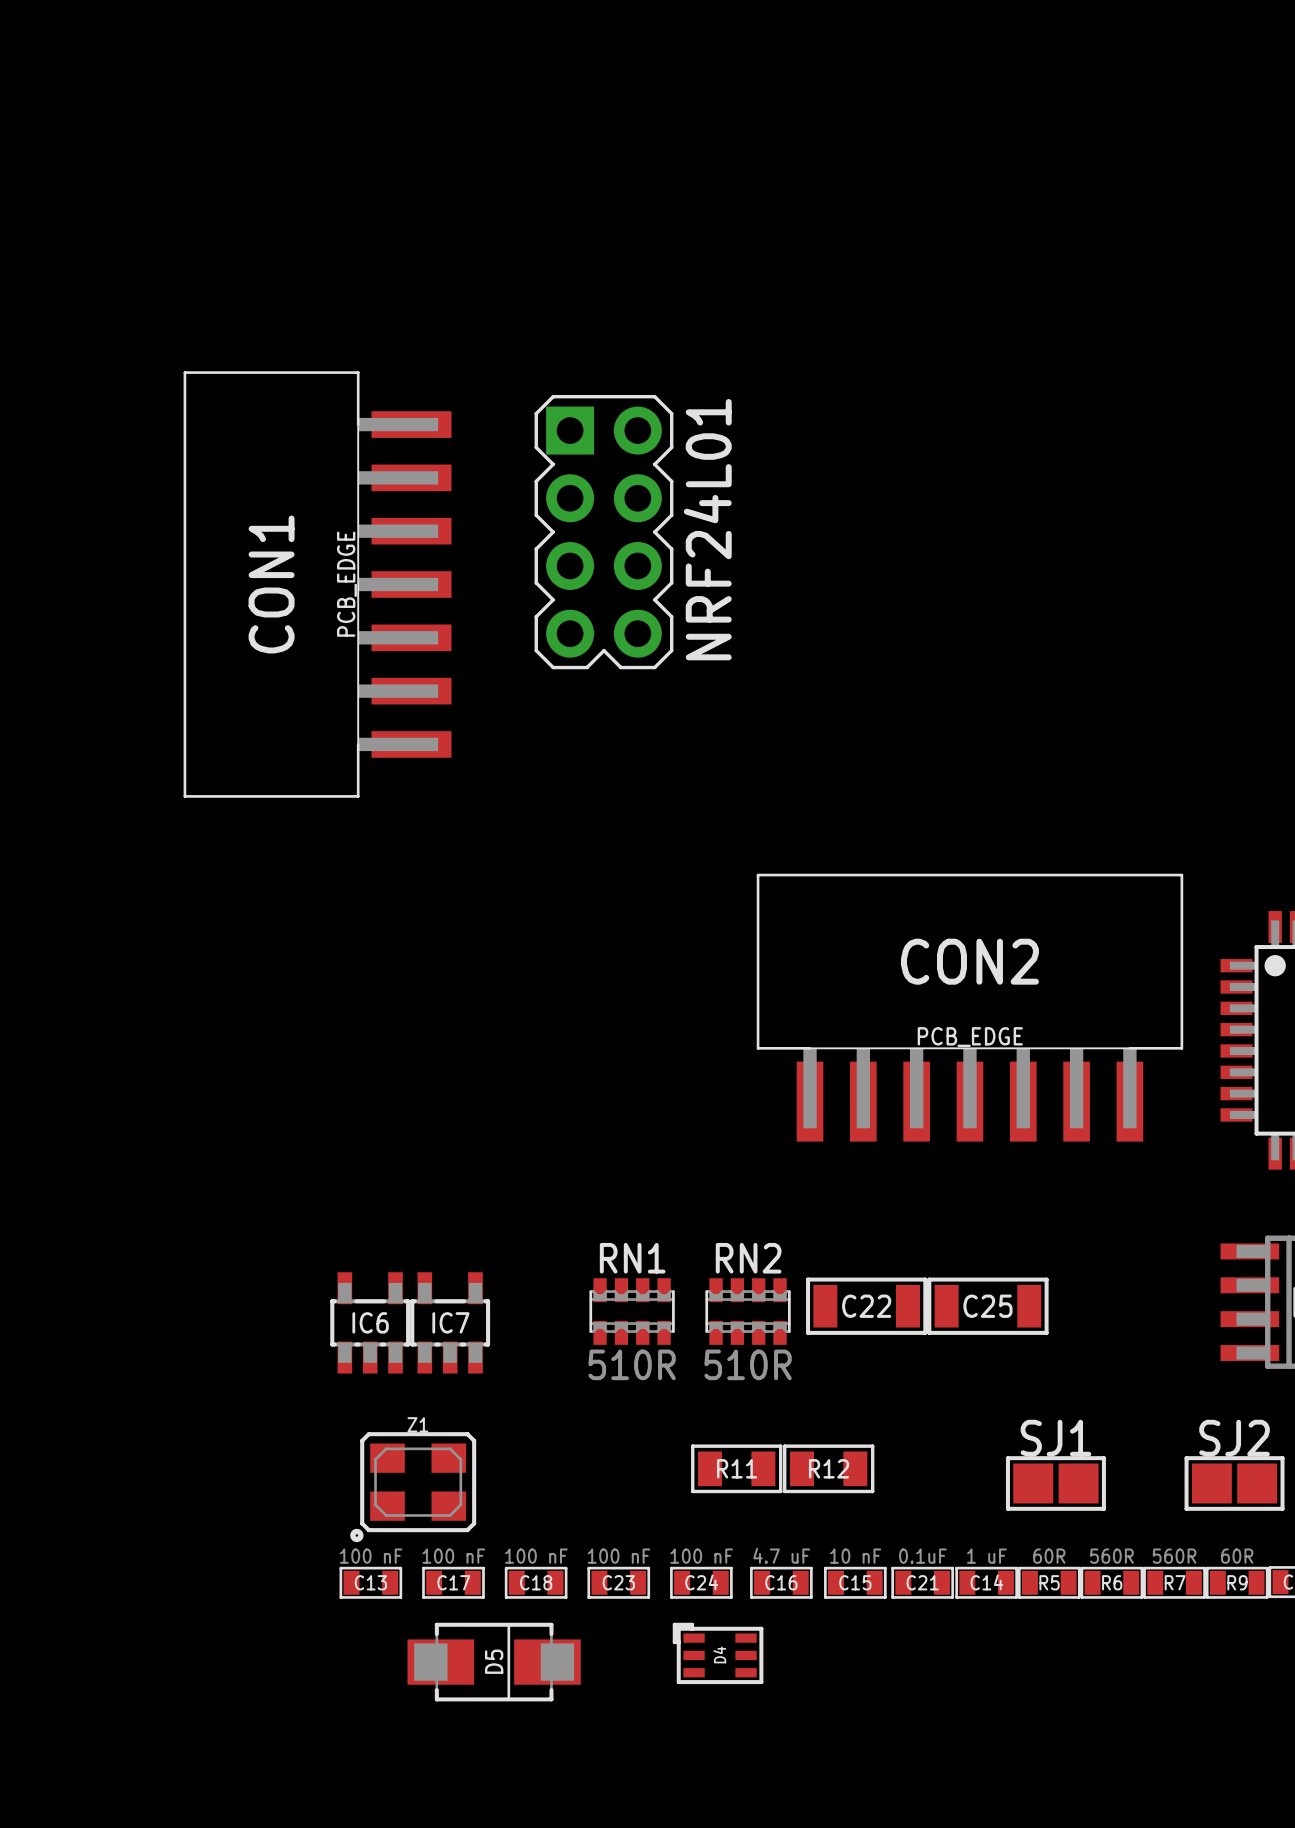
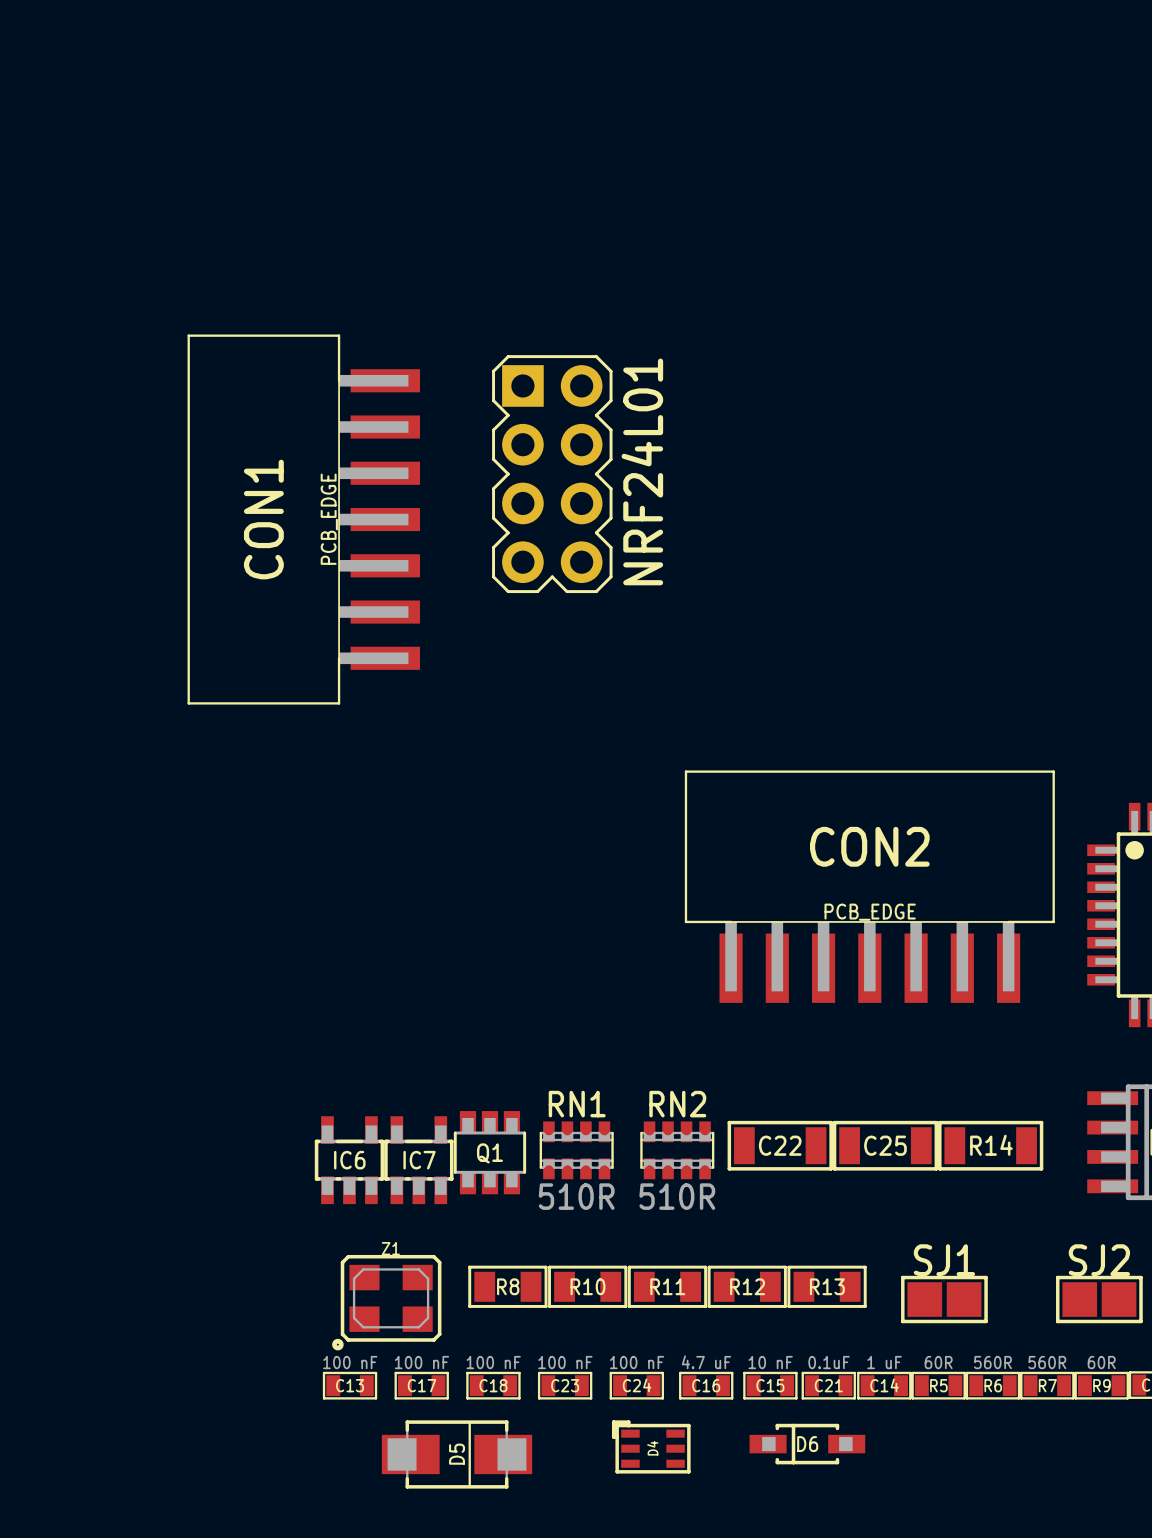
R14: none -> (990, 1145)
Q1: none -> (489, 1152)
R8: none -> (507, 1286)
R10: none -> (587, 1286)
R13: none -> (827, 1286)
D6: none -> (807, 1444)

